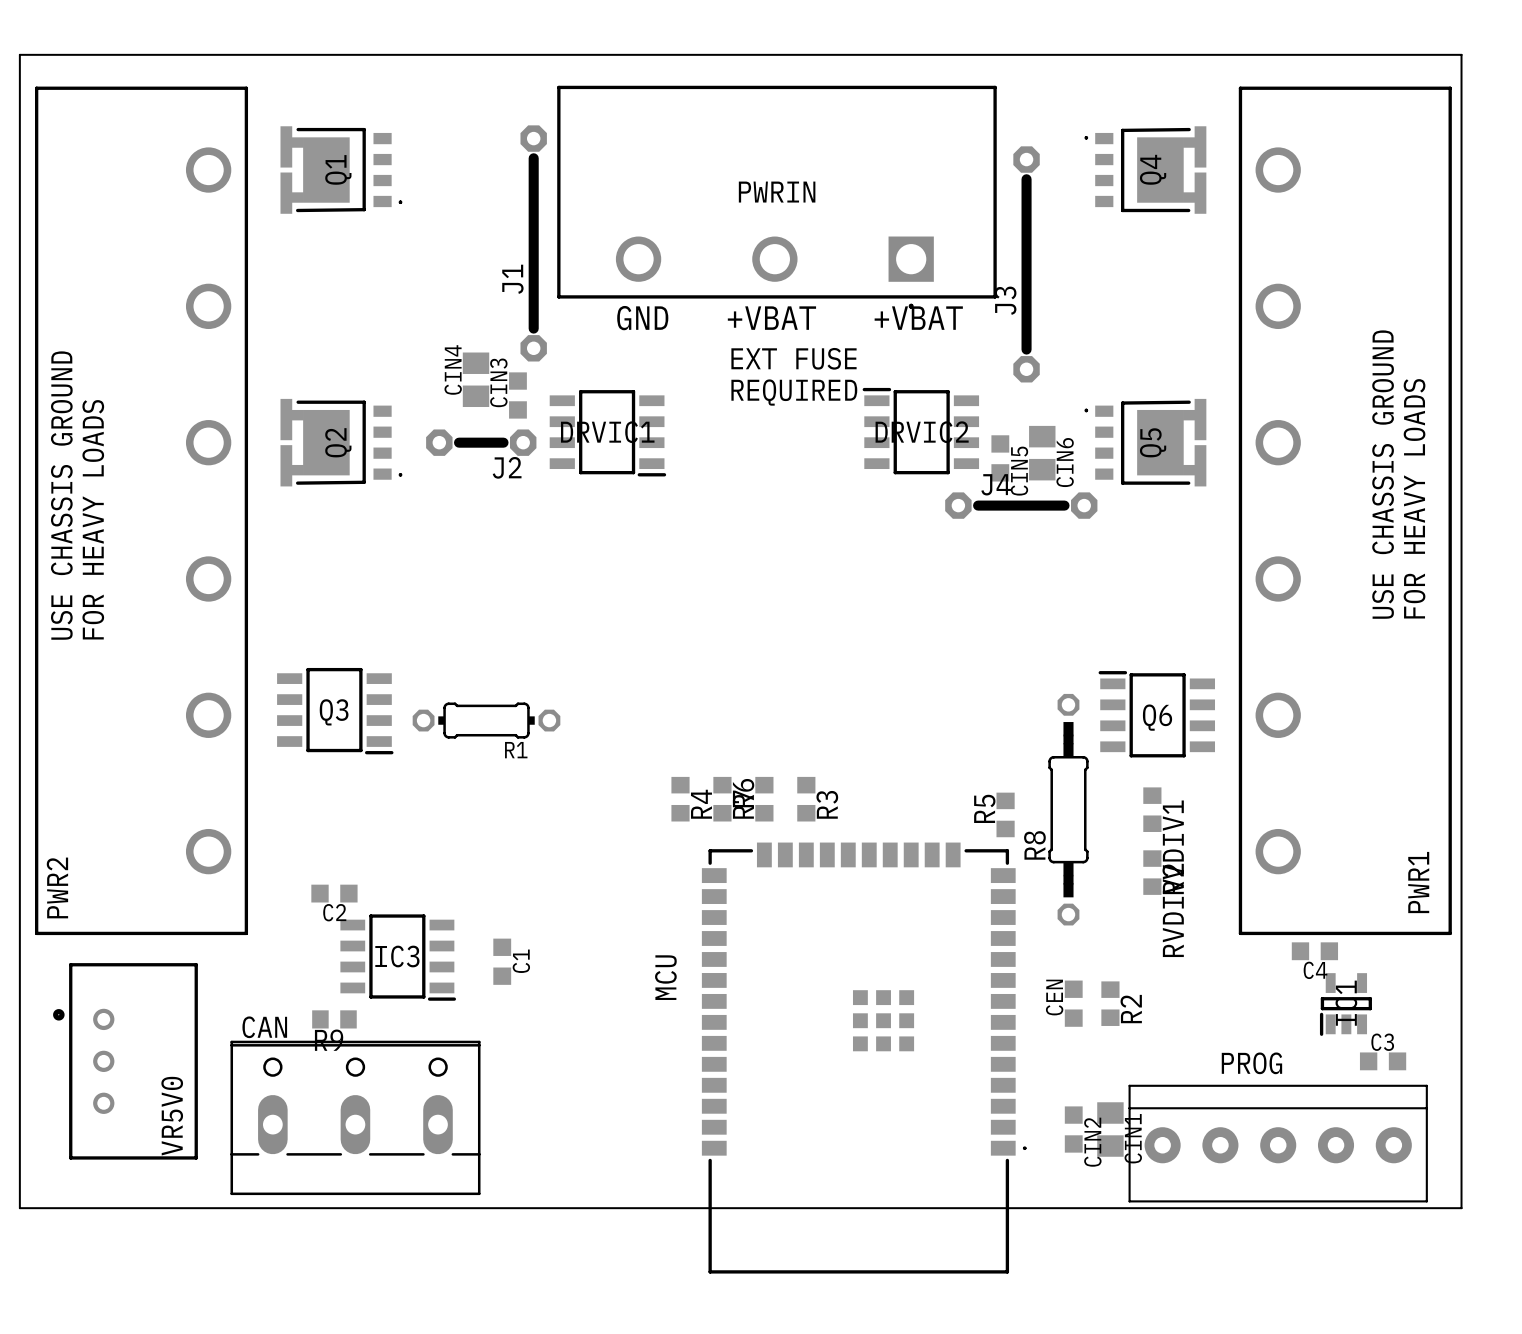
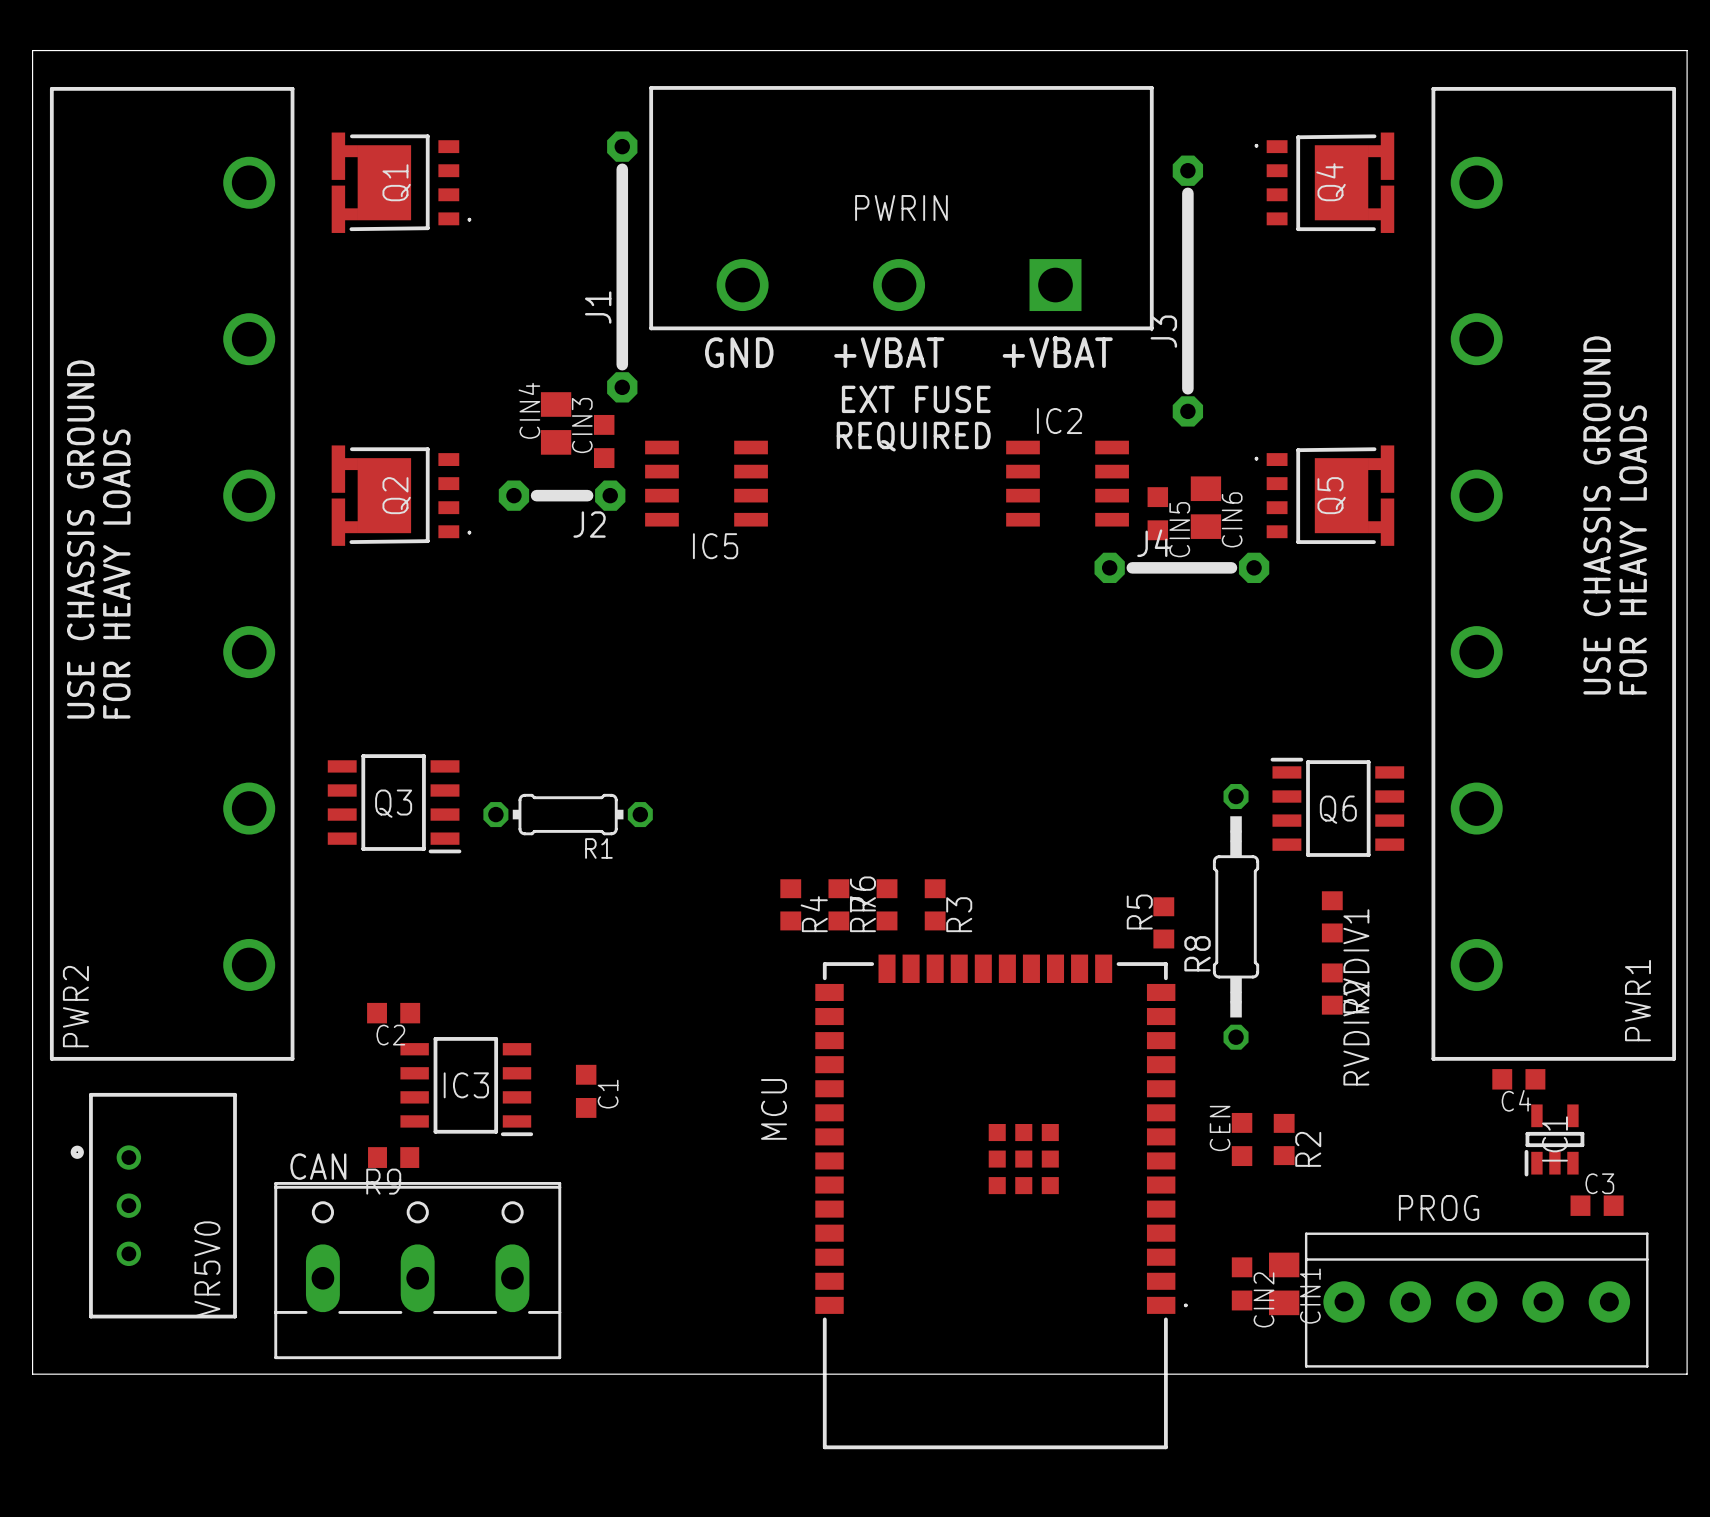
DRVIC2: (920, 431) -> none
IC5: none -> (706, 483)
IC2: none -> (1067, 483)
DRVIC1: (607, 433) -> none

